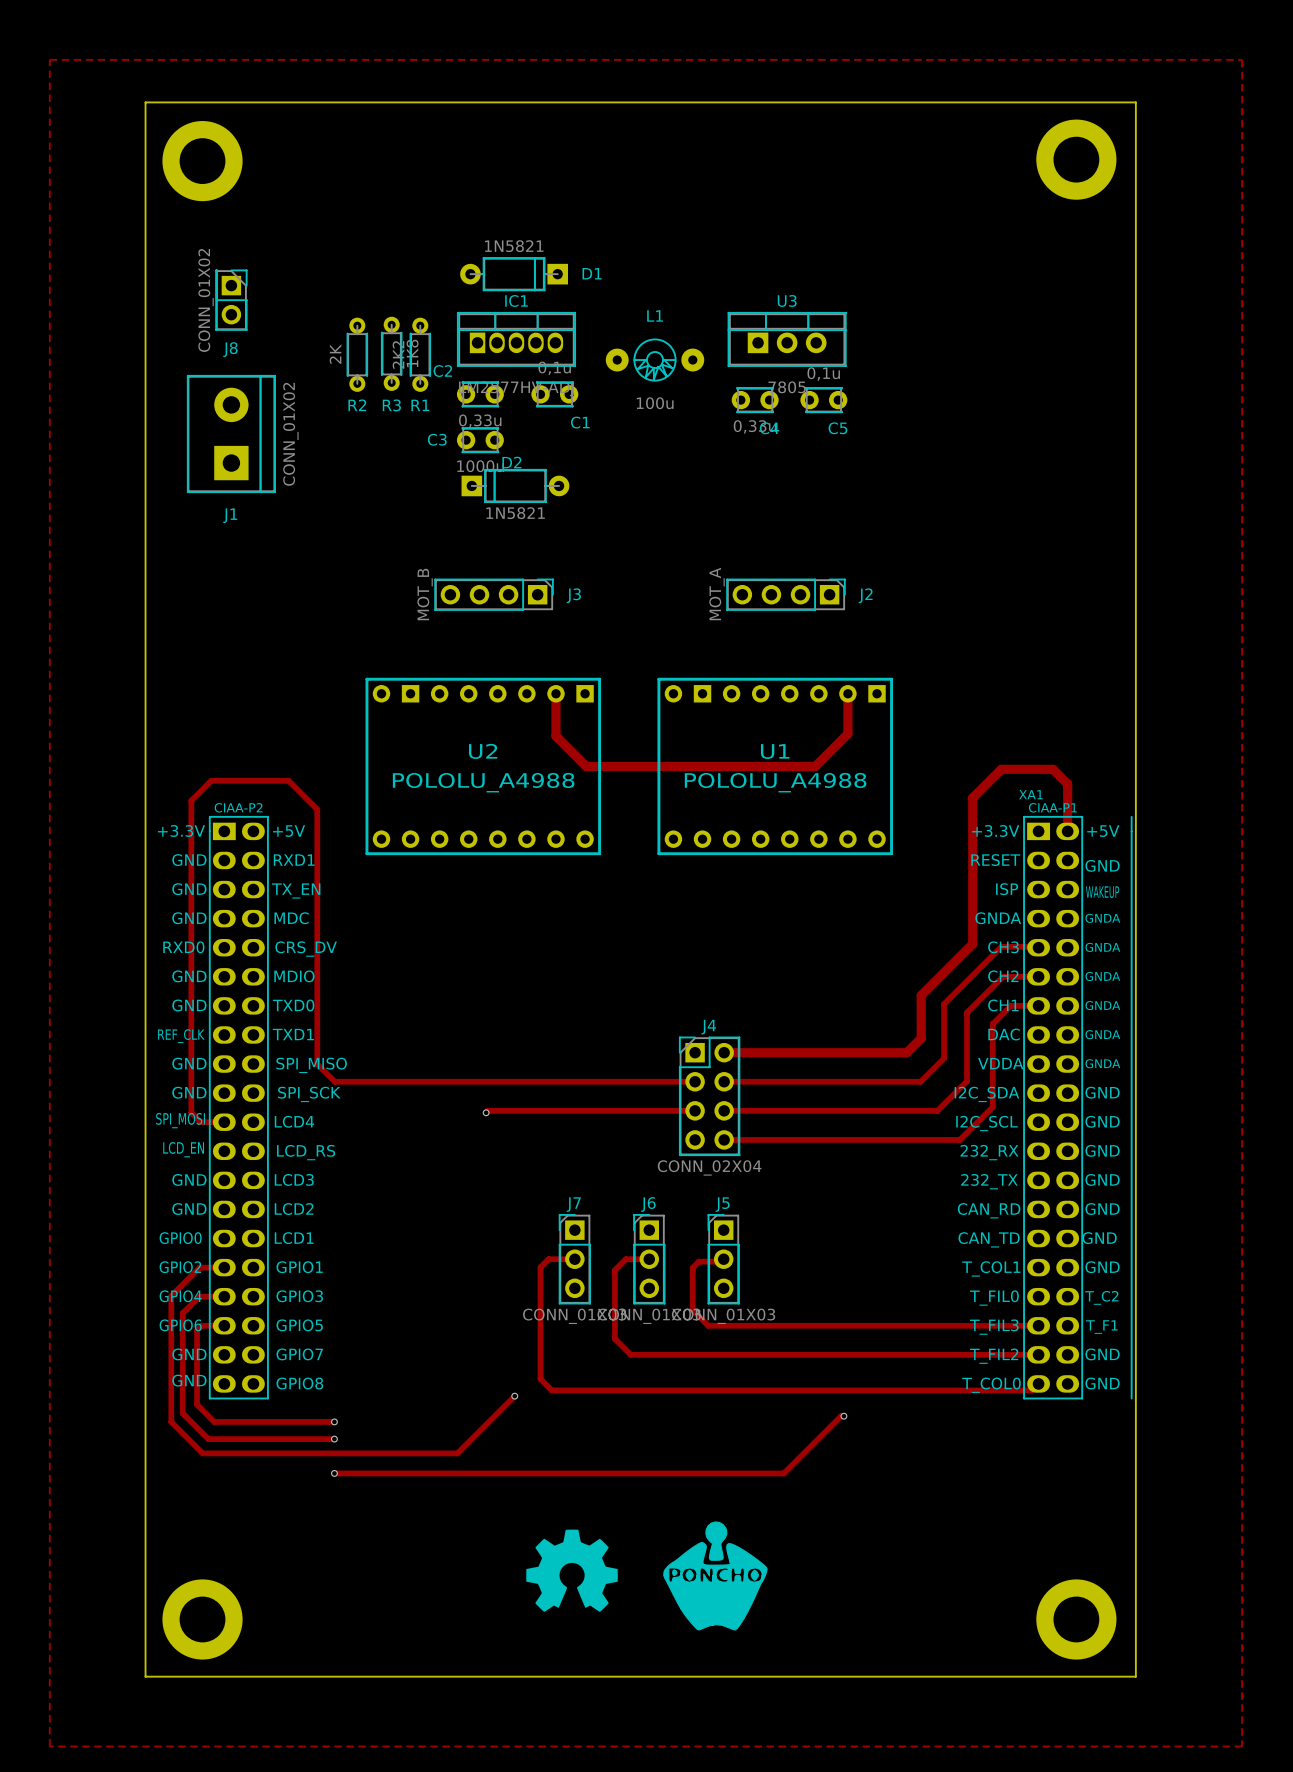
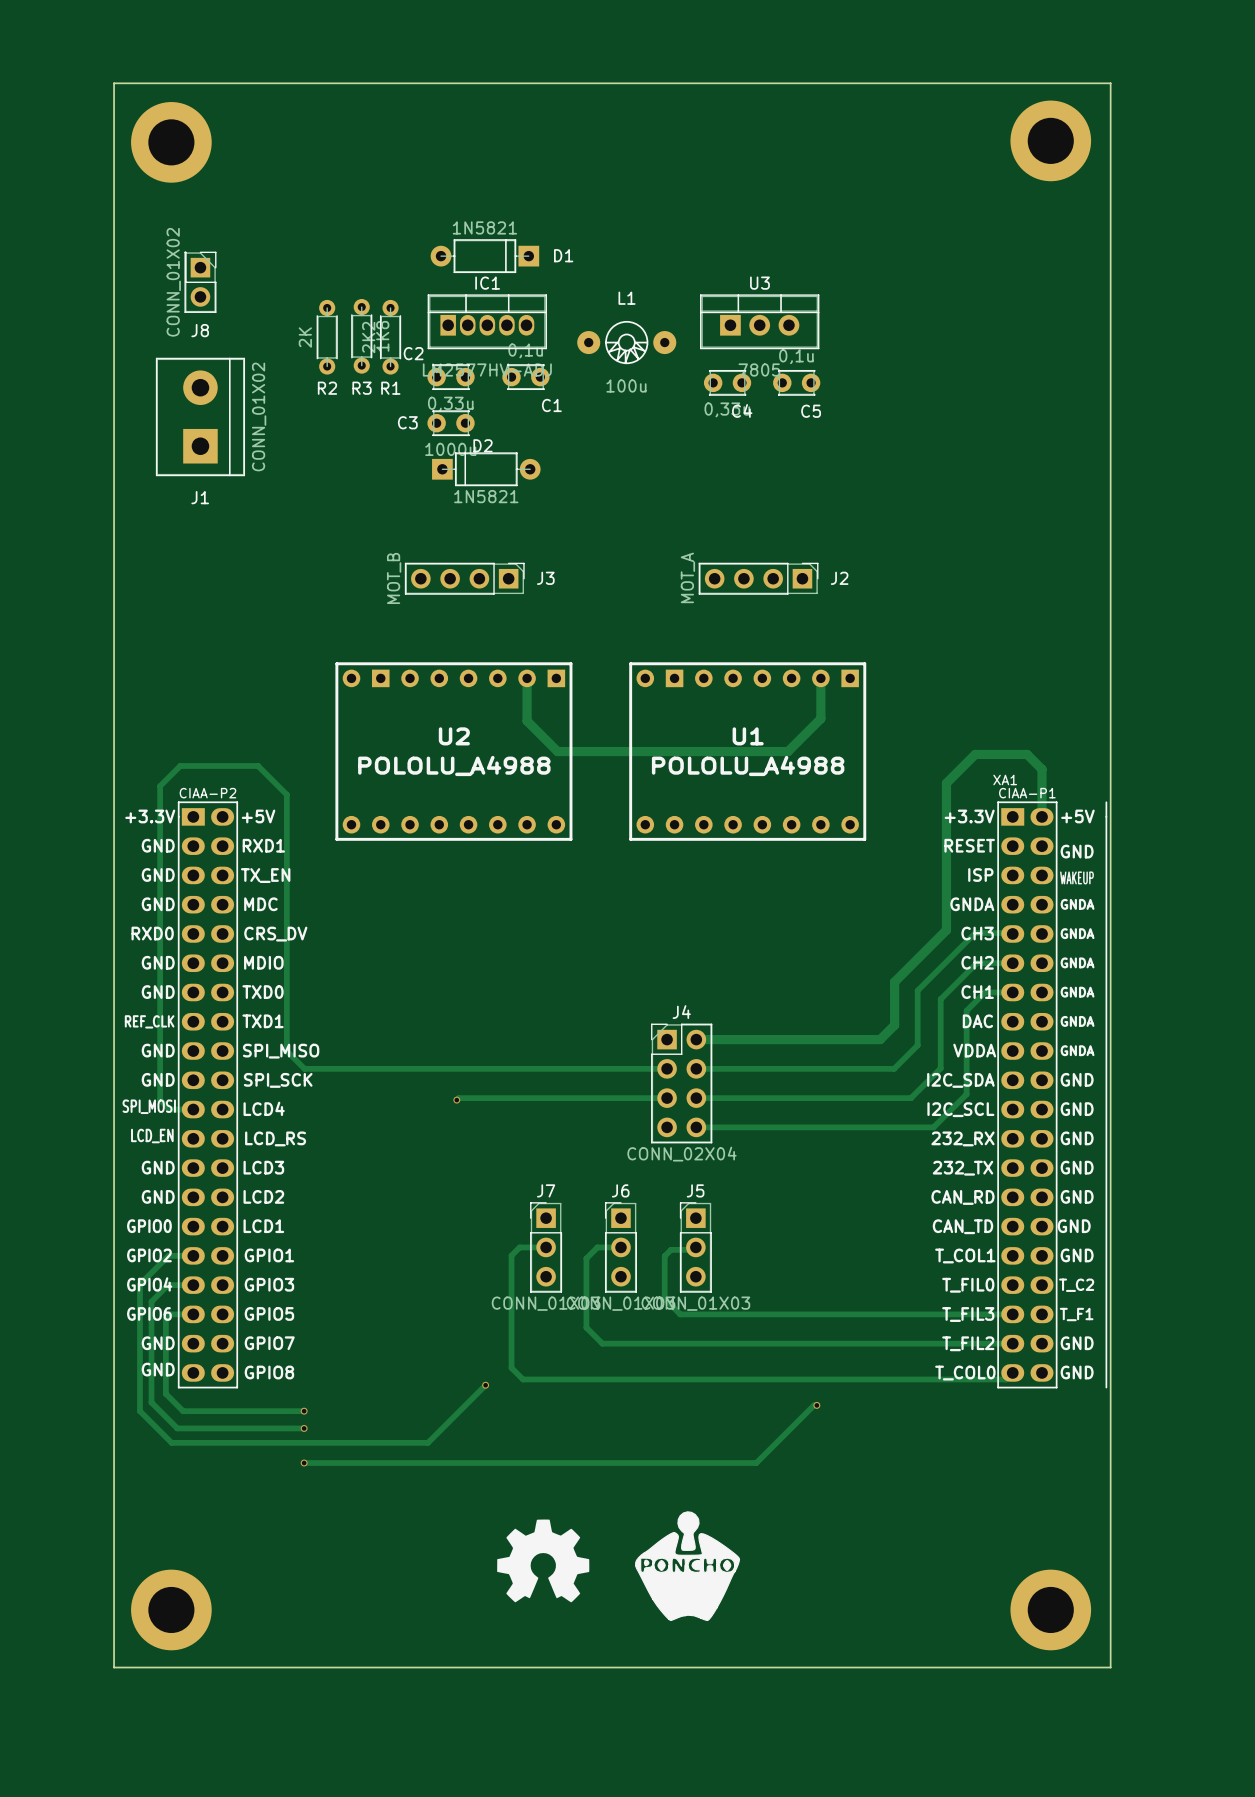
zone outline: (49, 59) (49, 1746) (1242, 1746) (1242, 59) (49, 59) -> none

